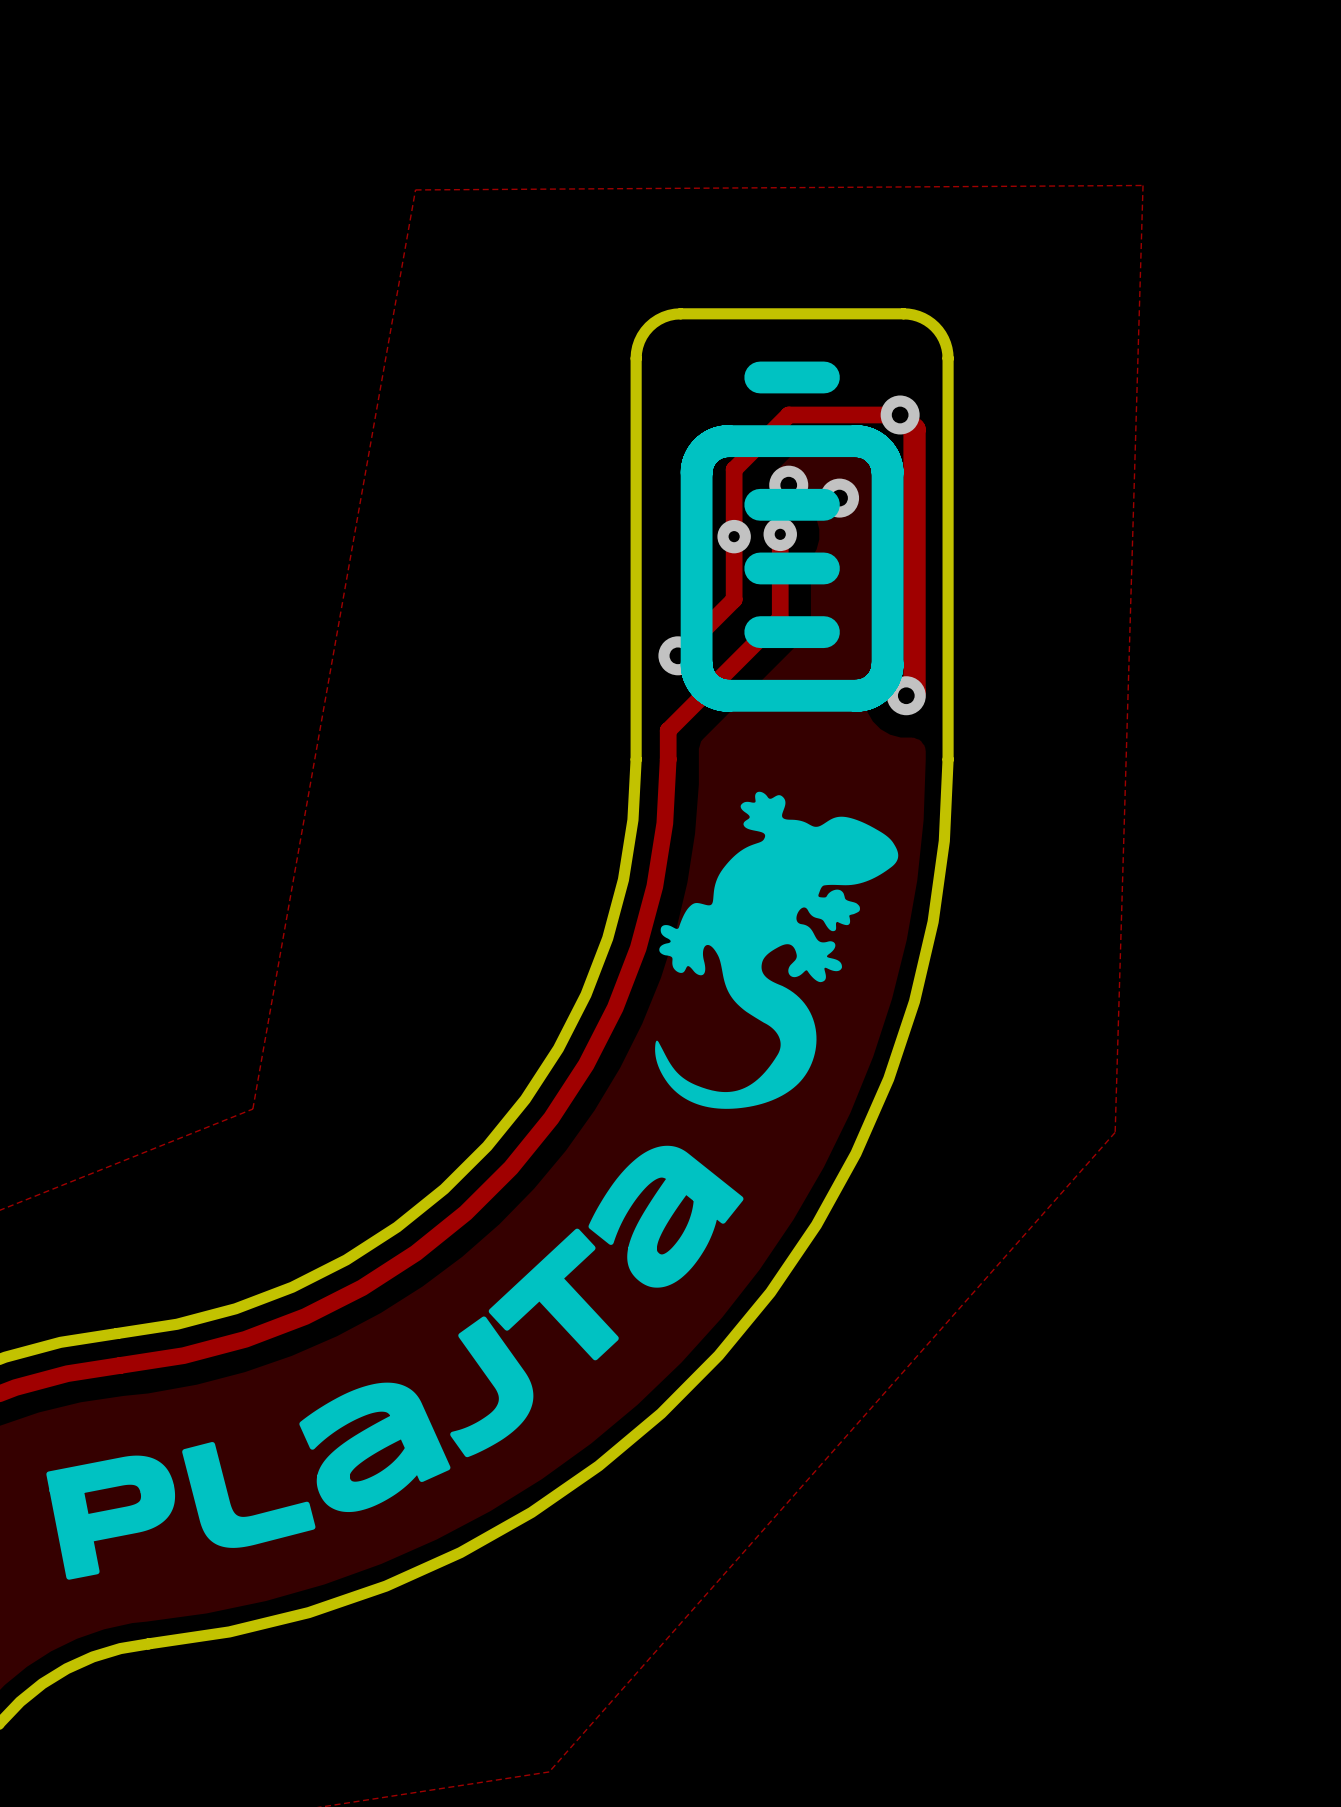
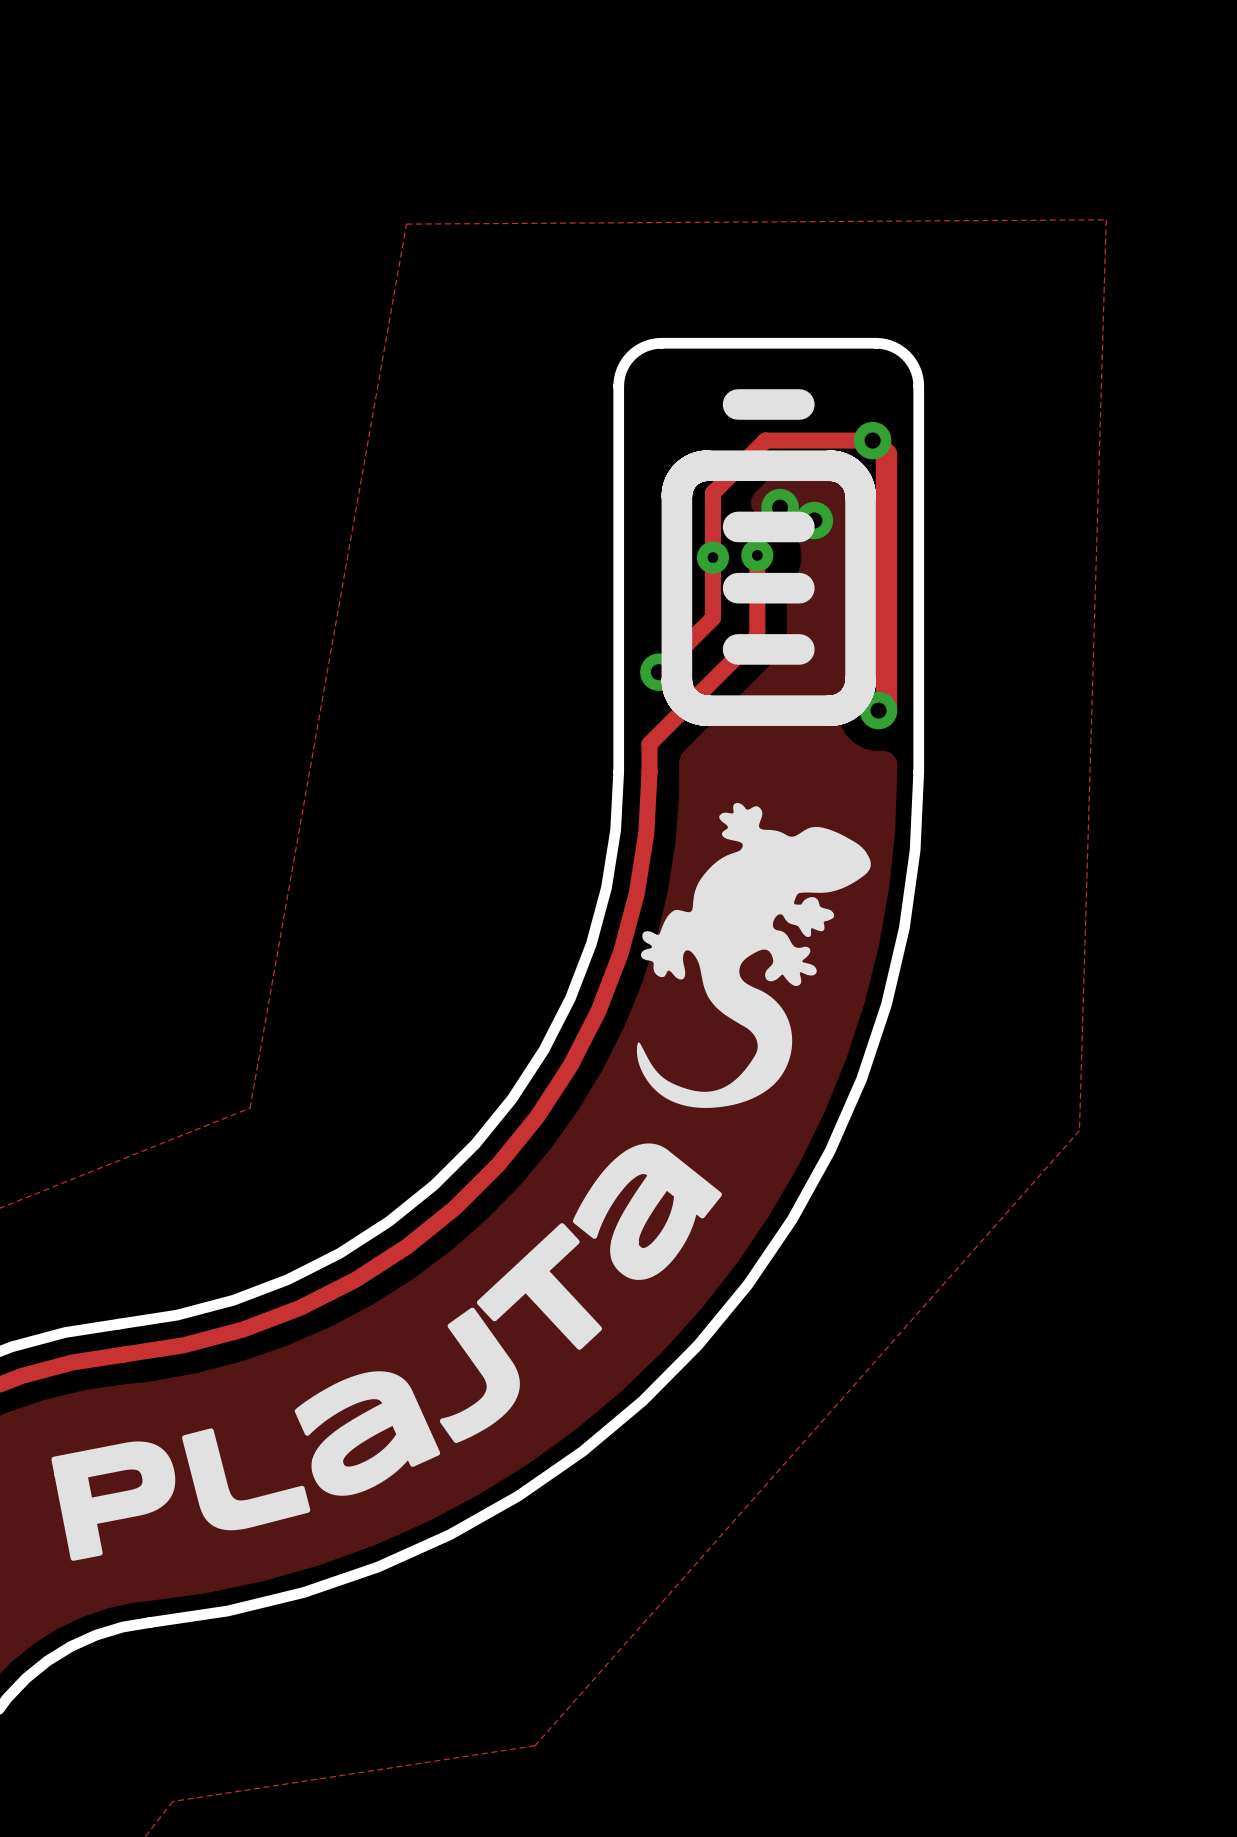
via position: (788, 485) -> (780, 507)

